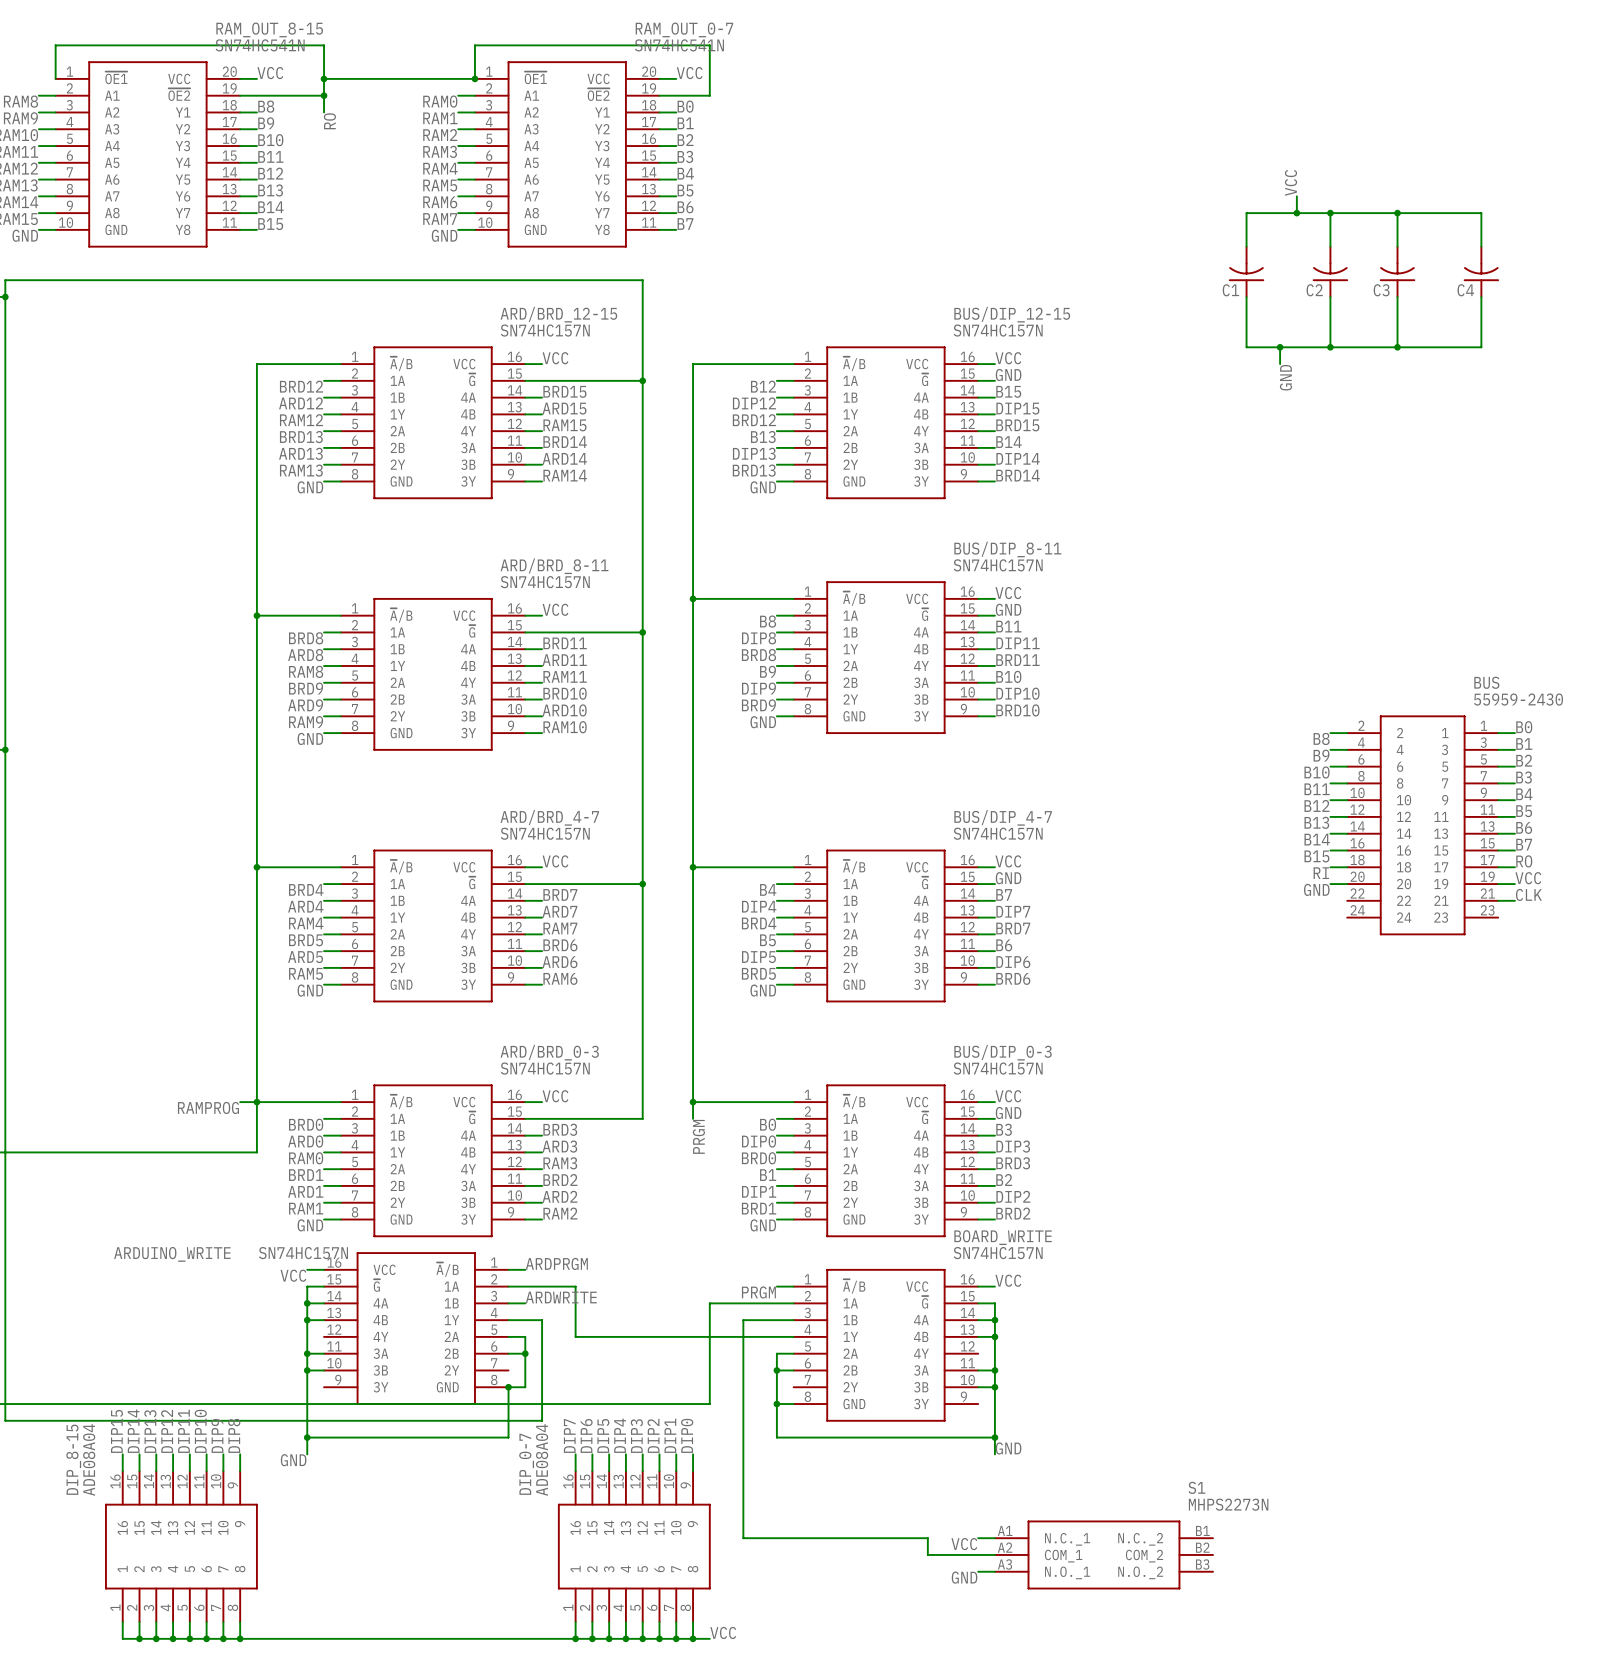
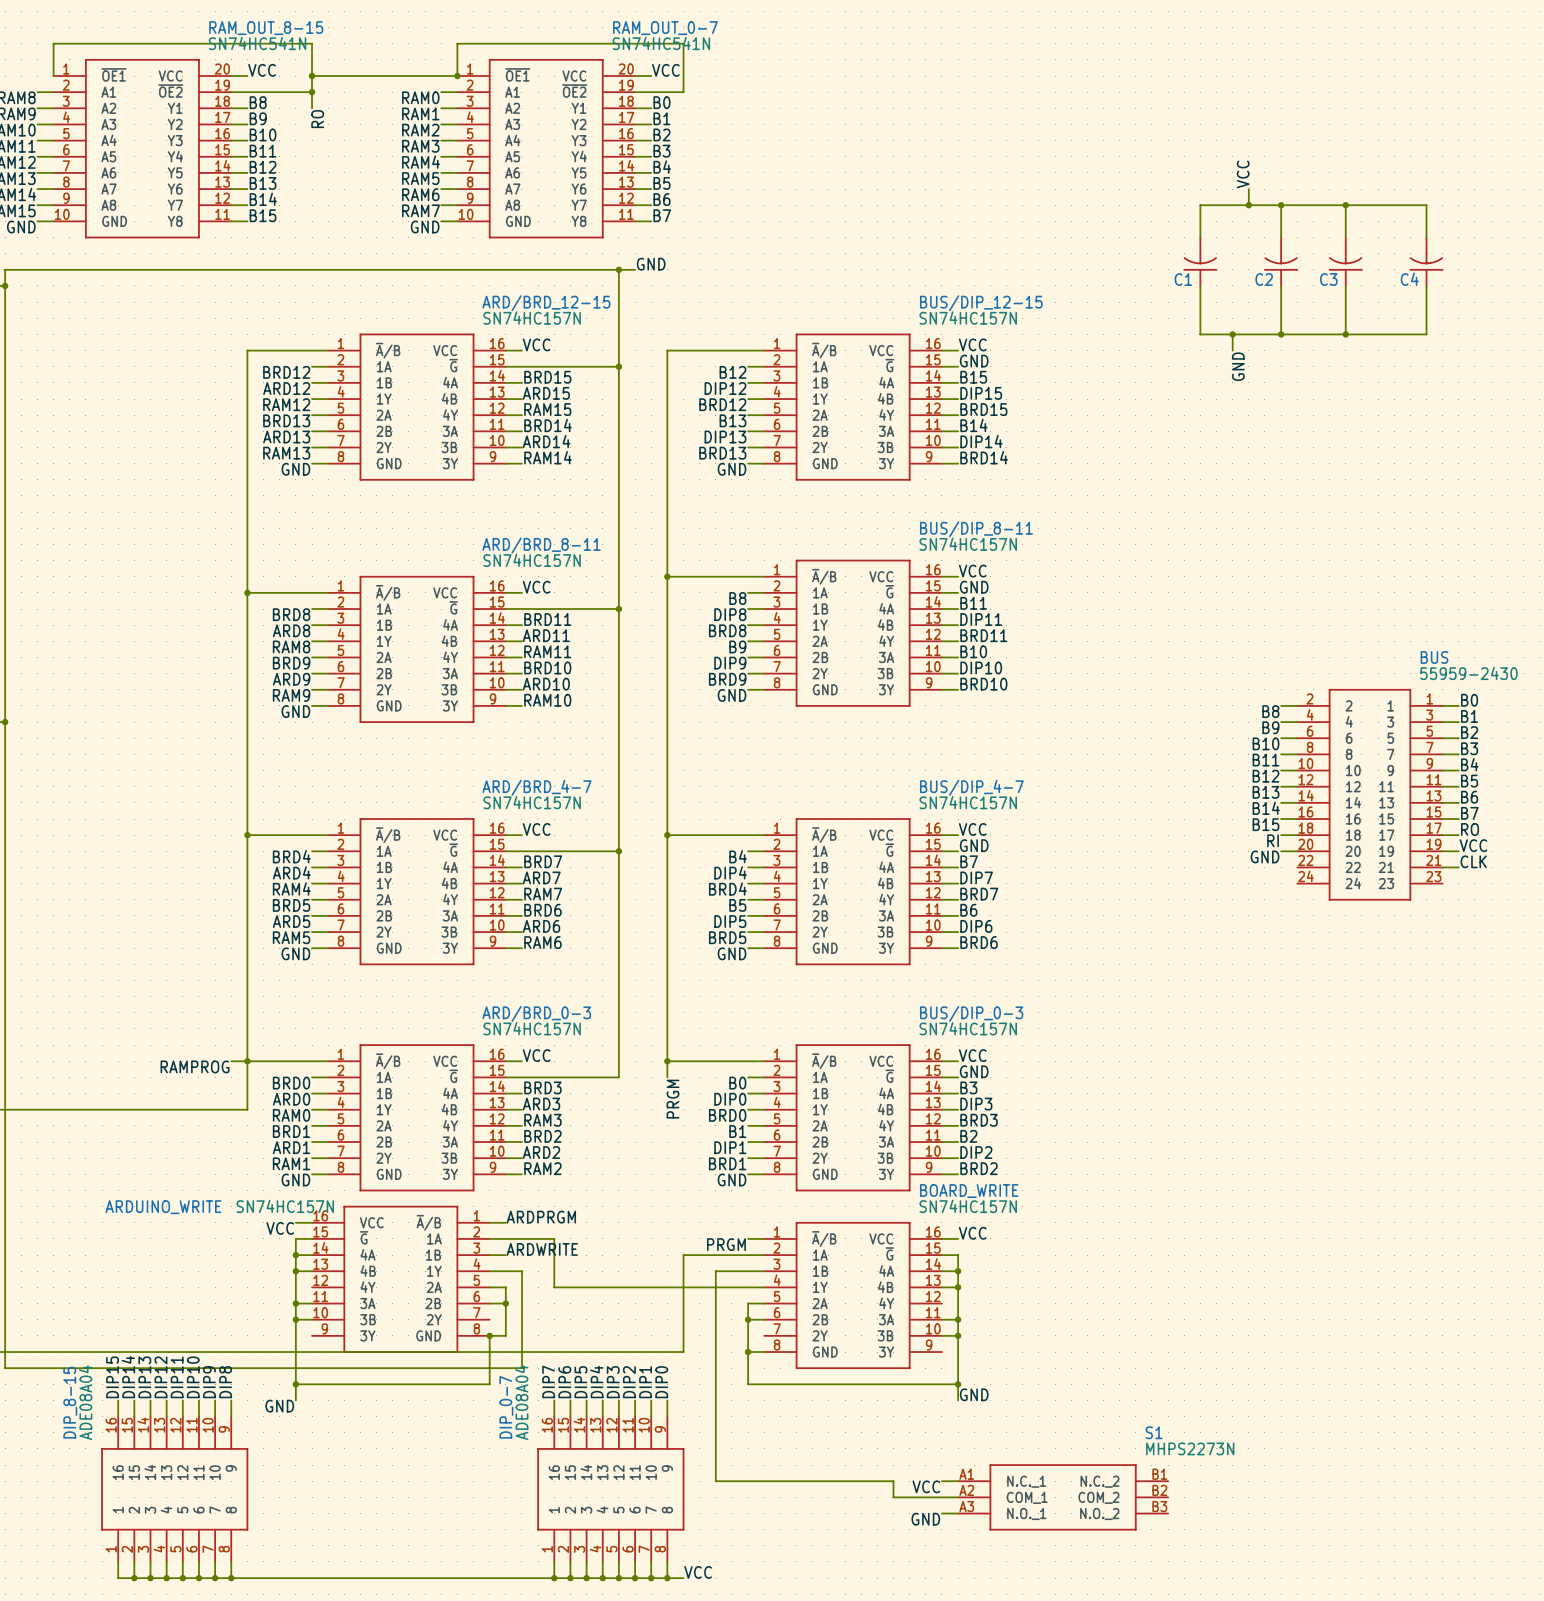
label: none -> GND (651, 264)
wire: none -> (618, 269) (635, 269)
junction: none -> (618, 269)

